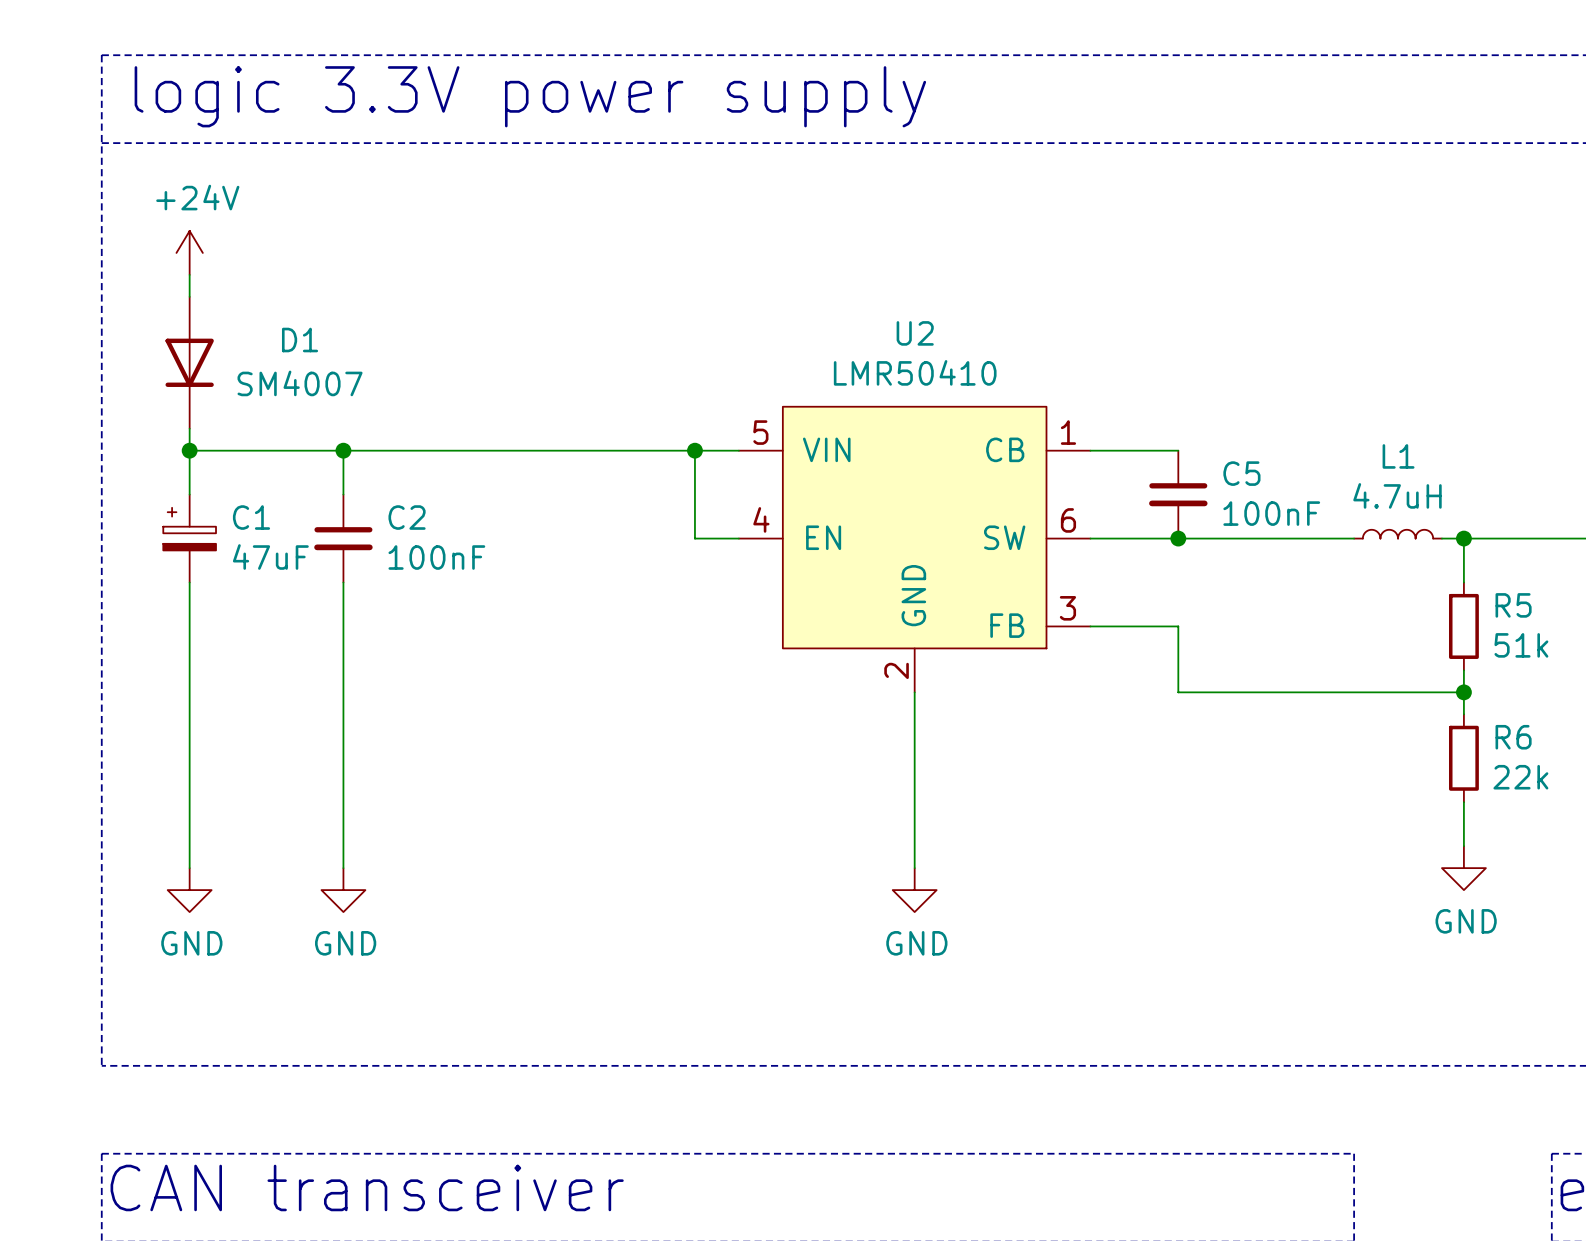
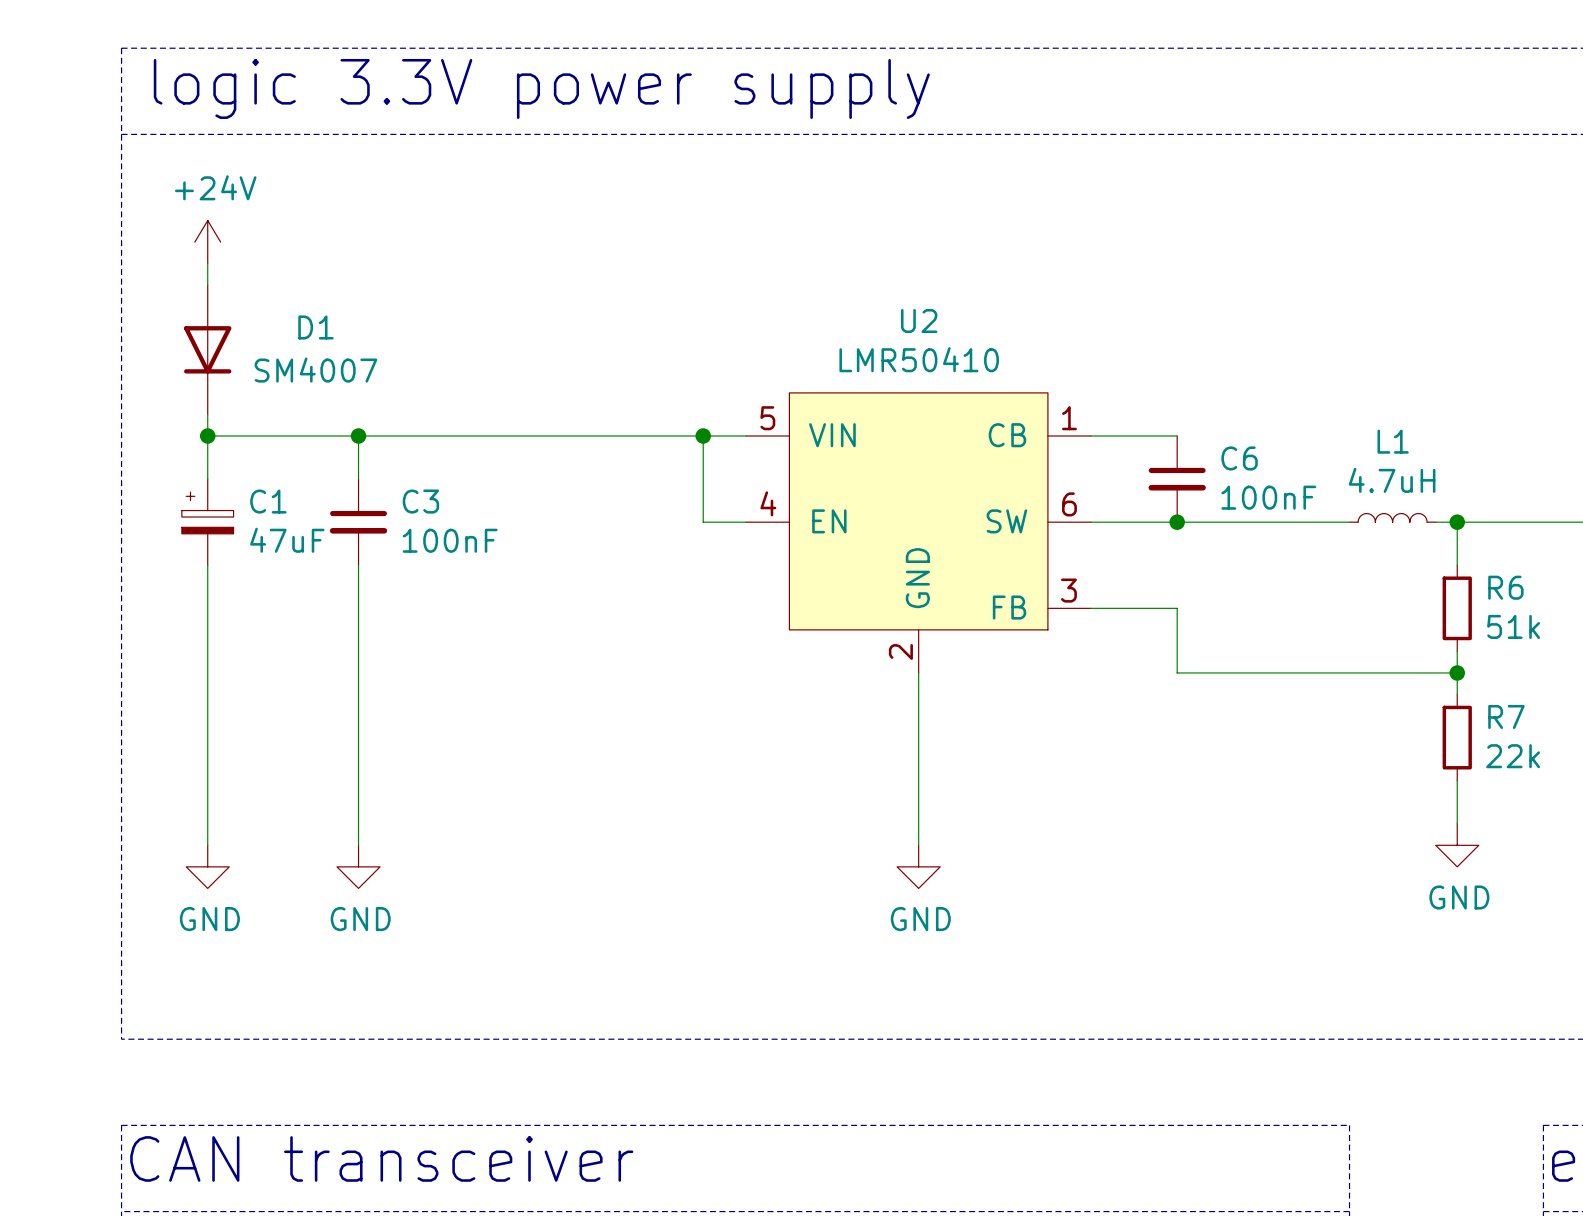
C5 name: C5 (1241, 473) -> C6 (1239, 458)
C2 name: C2 (407, 517) -> C3 (420, 501)
R5 name: R5 (1513, 605) -> R6 (1505, 587)
R6 name: R6 (1513, 737) -> R7 (1506, 716)

